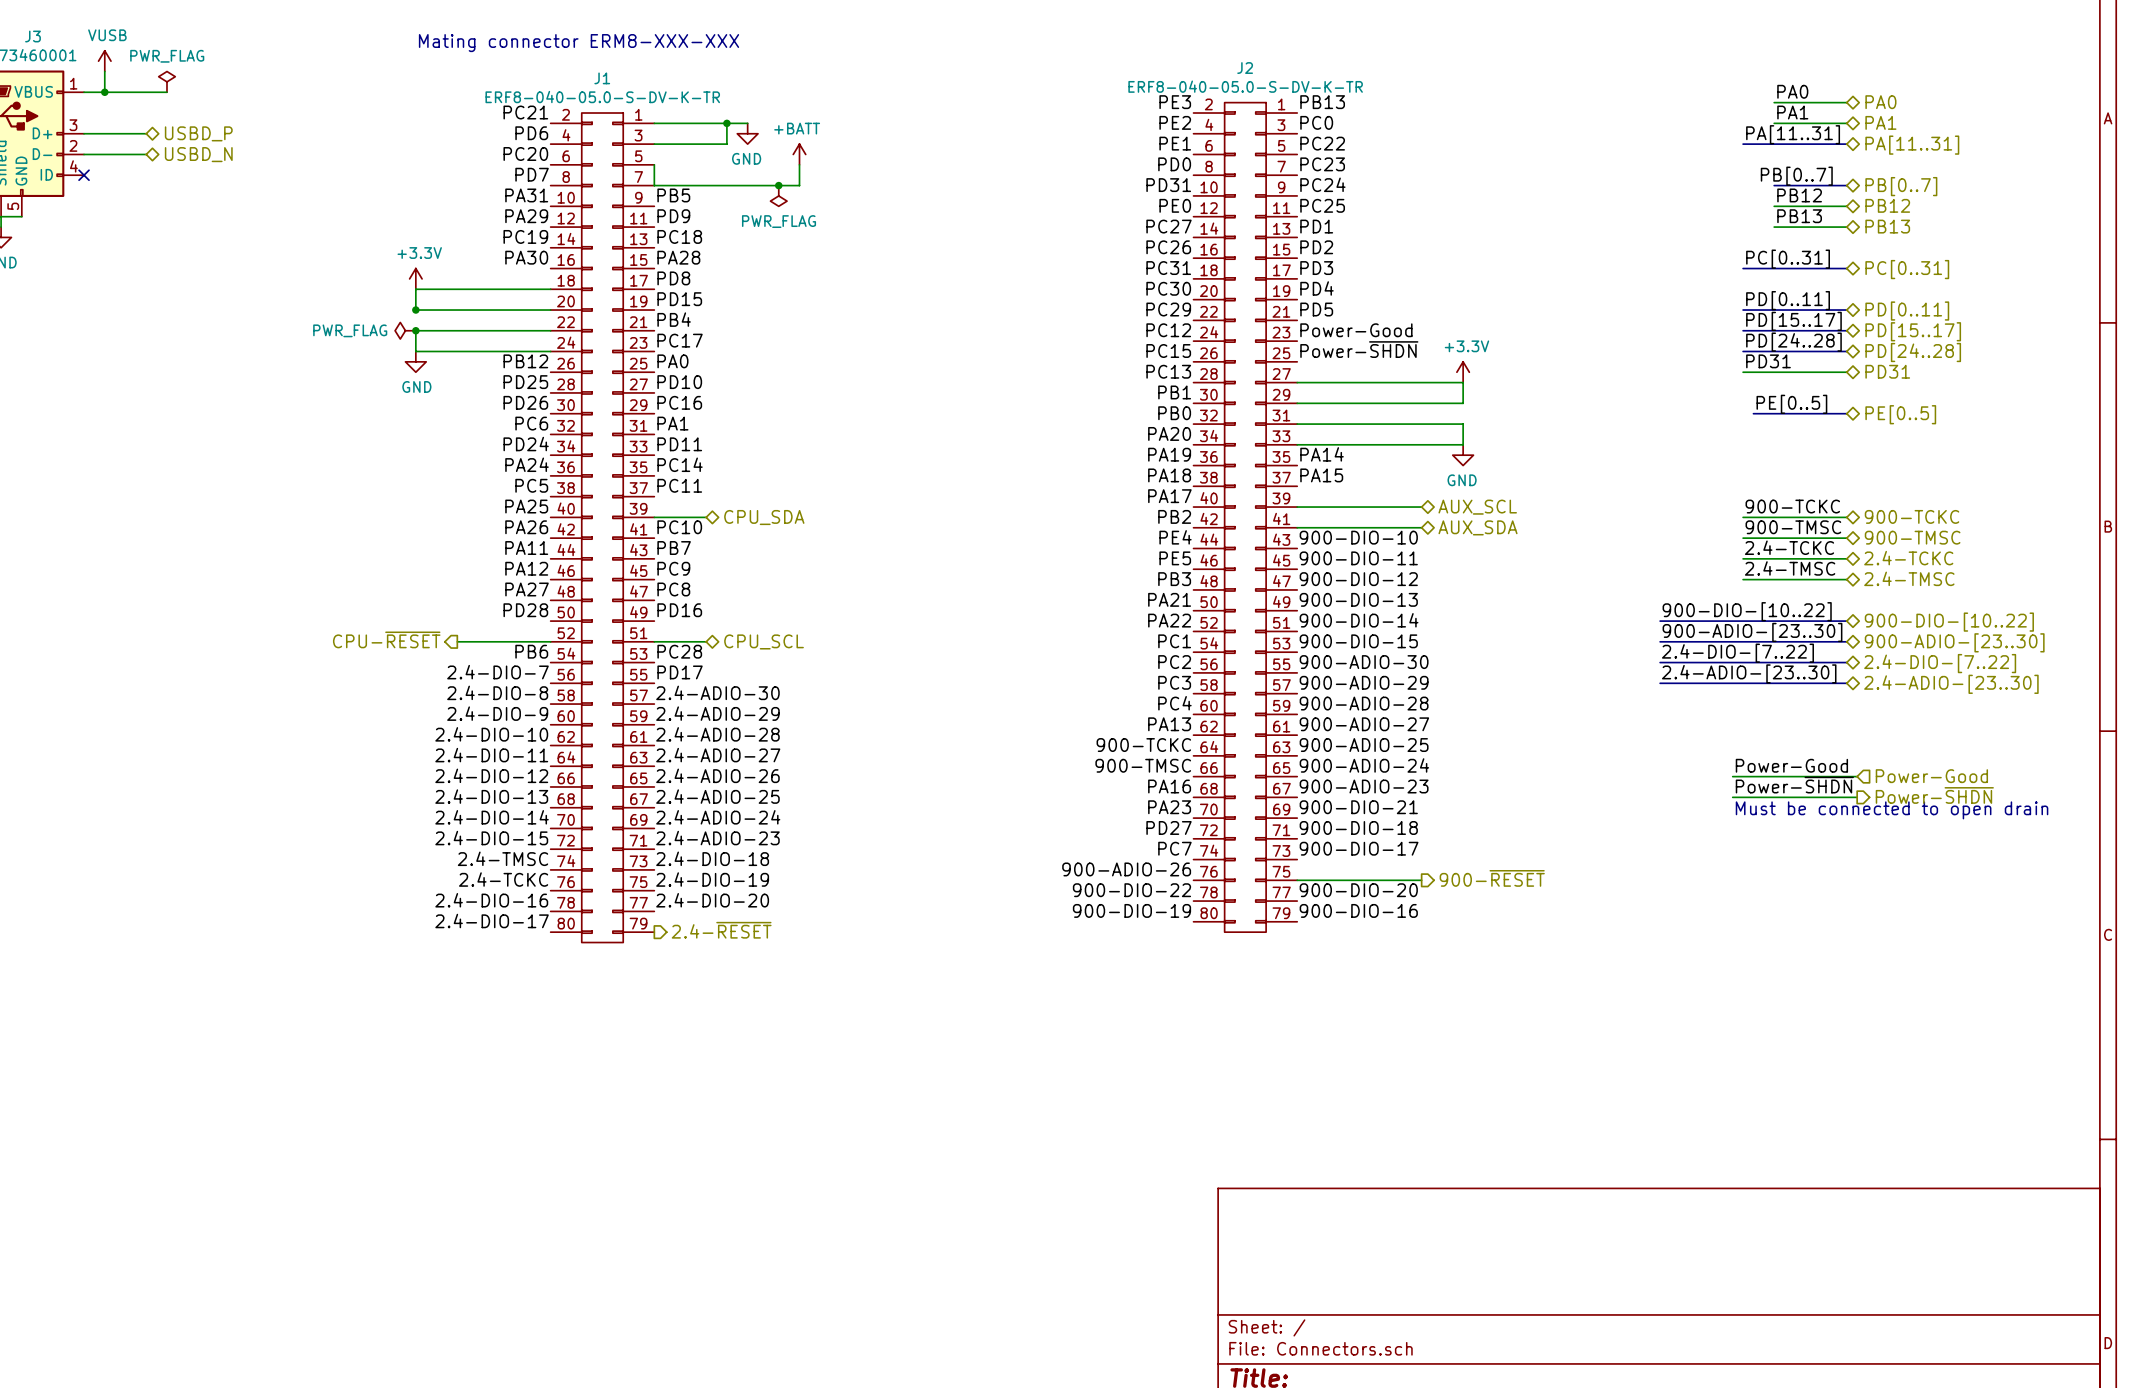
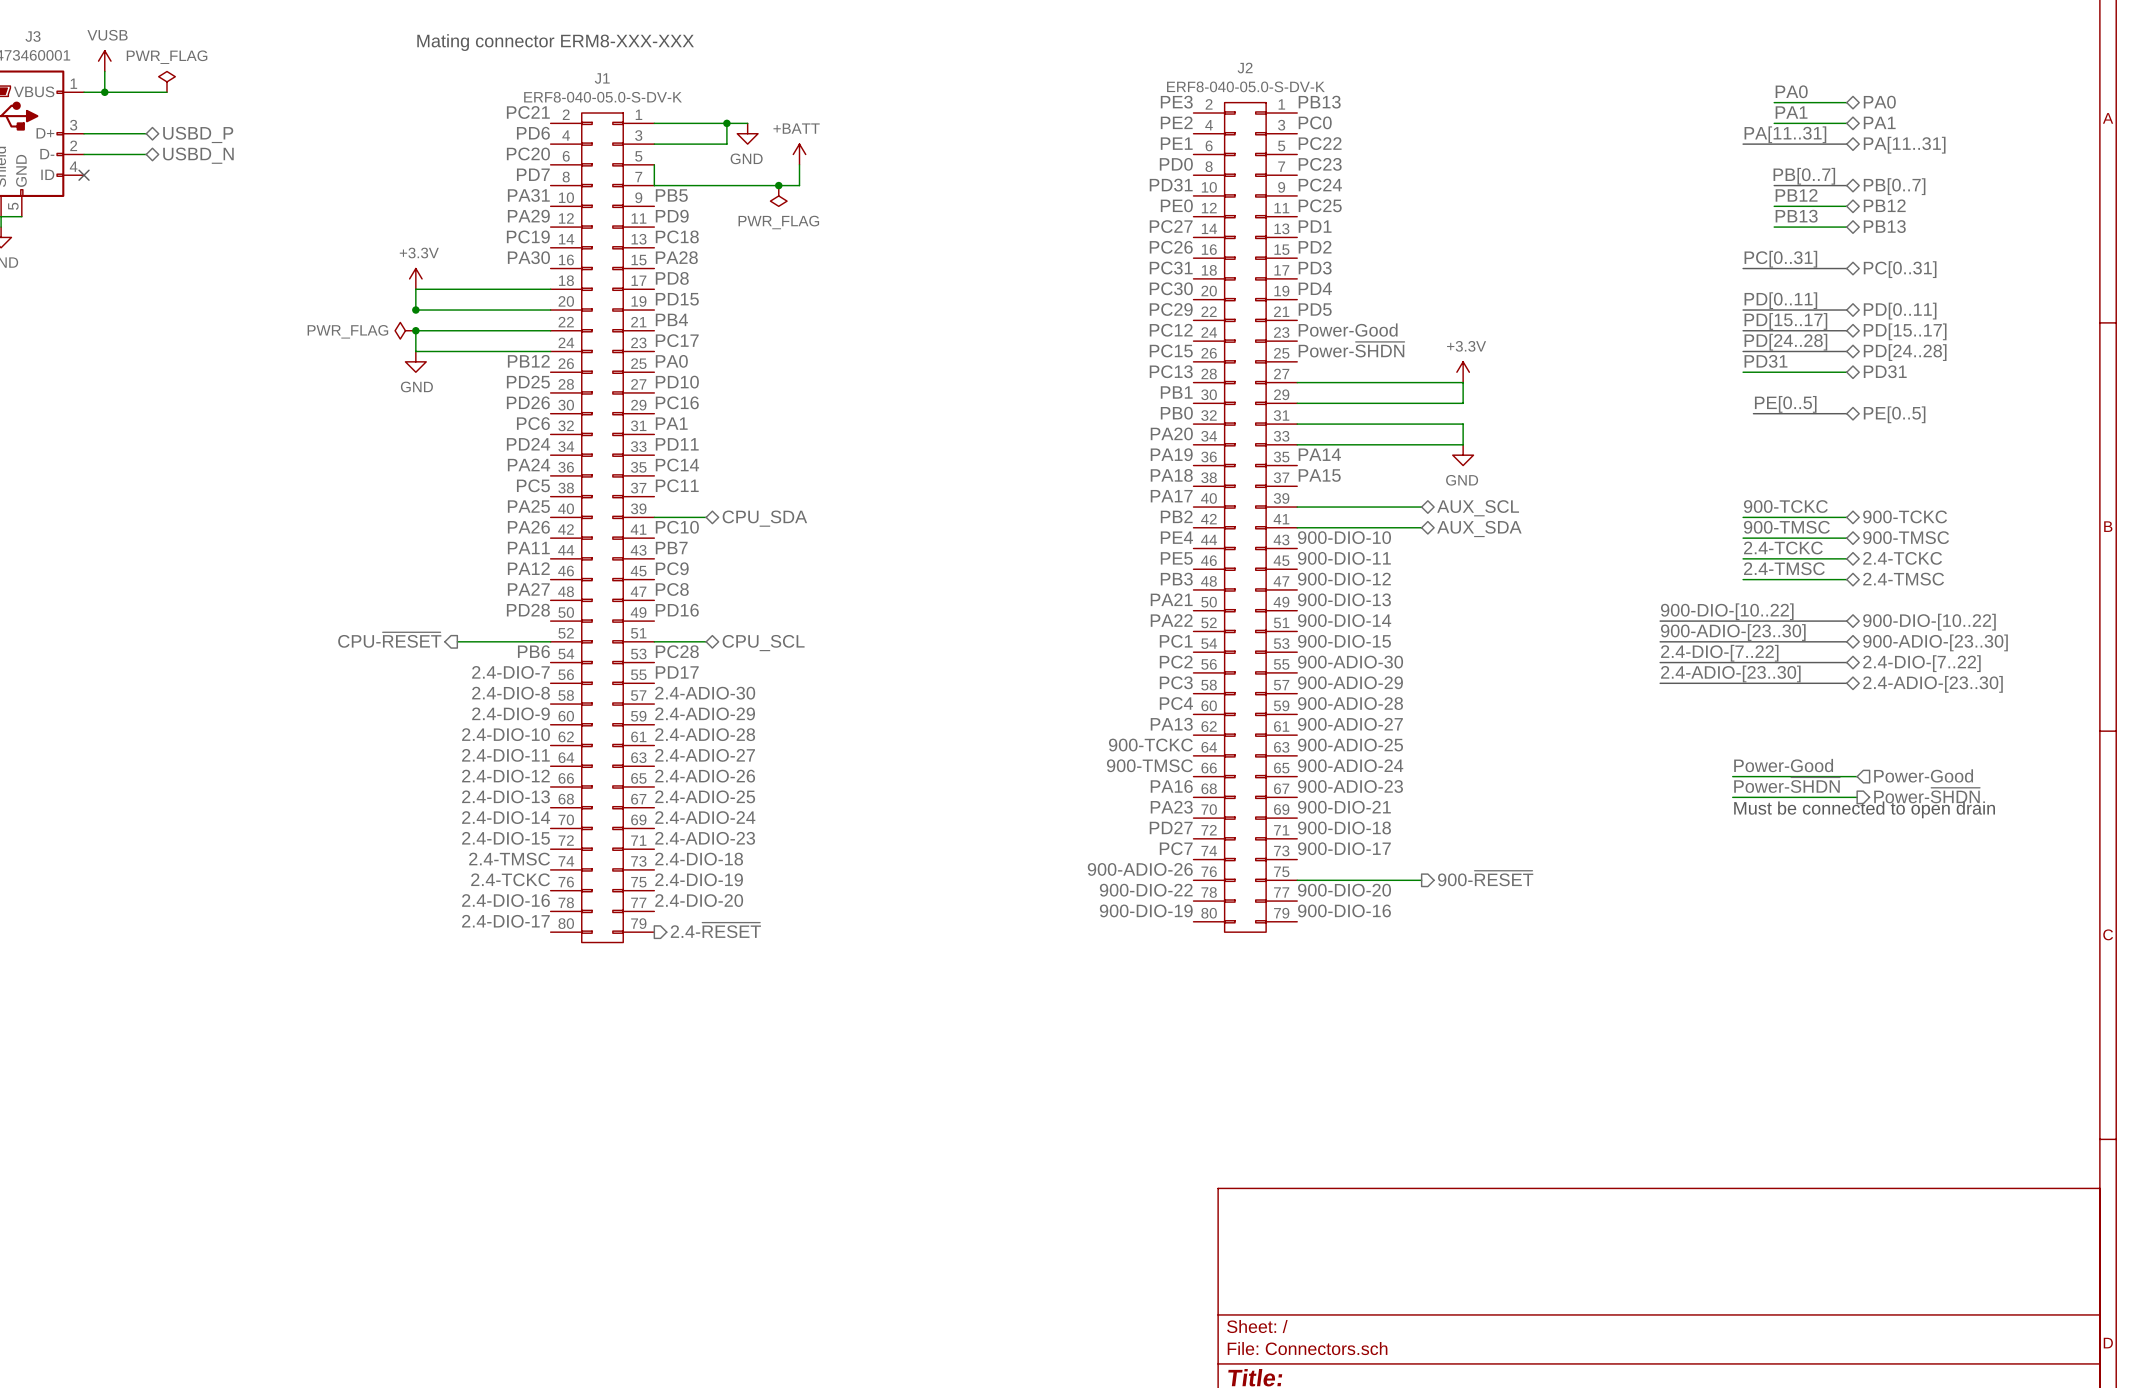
J2 value: ERF8-040-05.0-S-DV-K-TR (1245, 86) -> ERF8-040-05.0-S-DV-K (1245, 86)
J1 value: ERF8-040-05.0-S-DV-K-TR (602, 97) -> ERF8-040-05.0-S-DV-K (603, 97)

